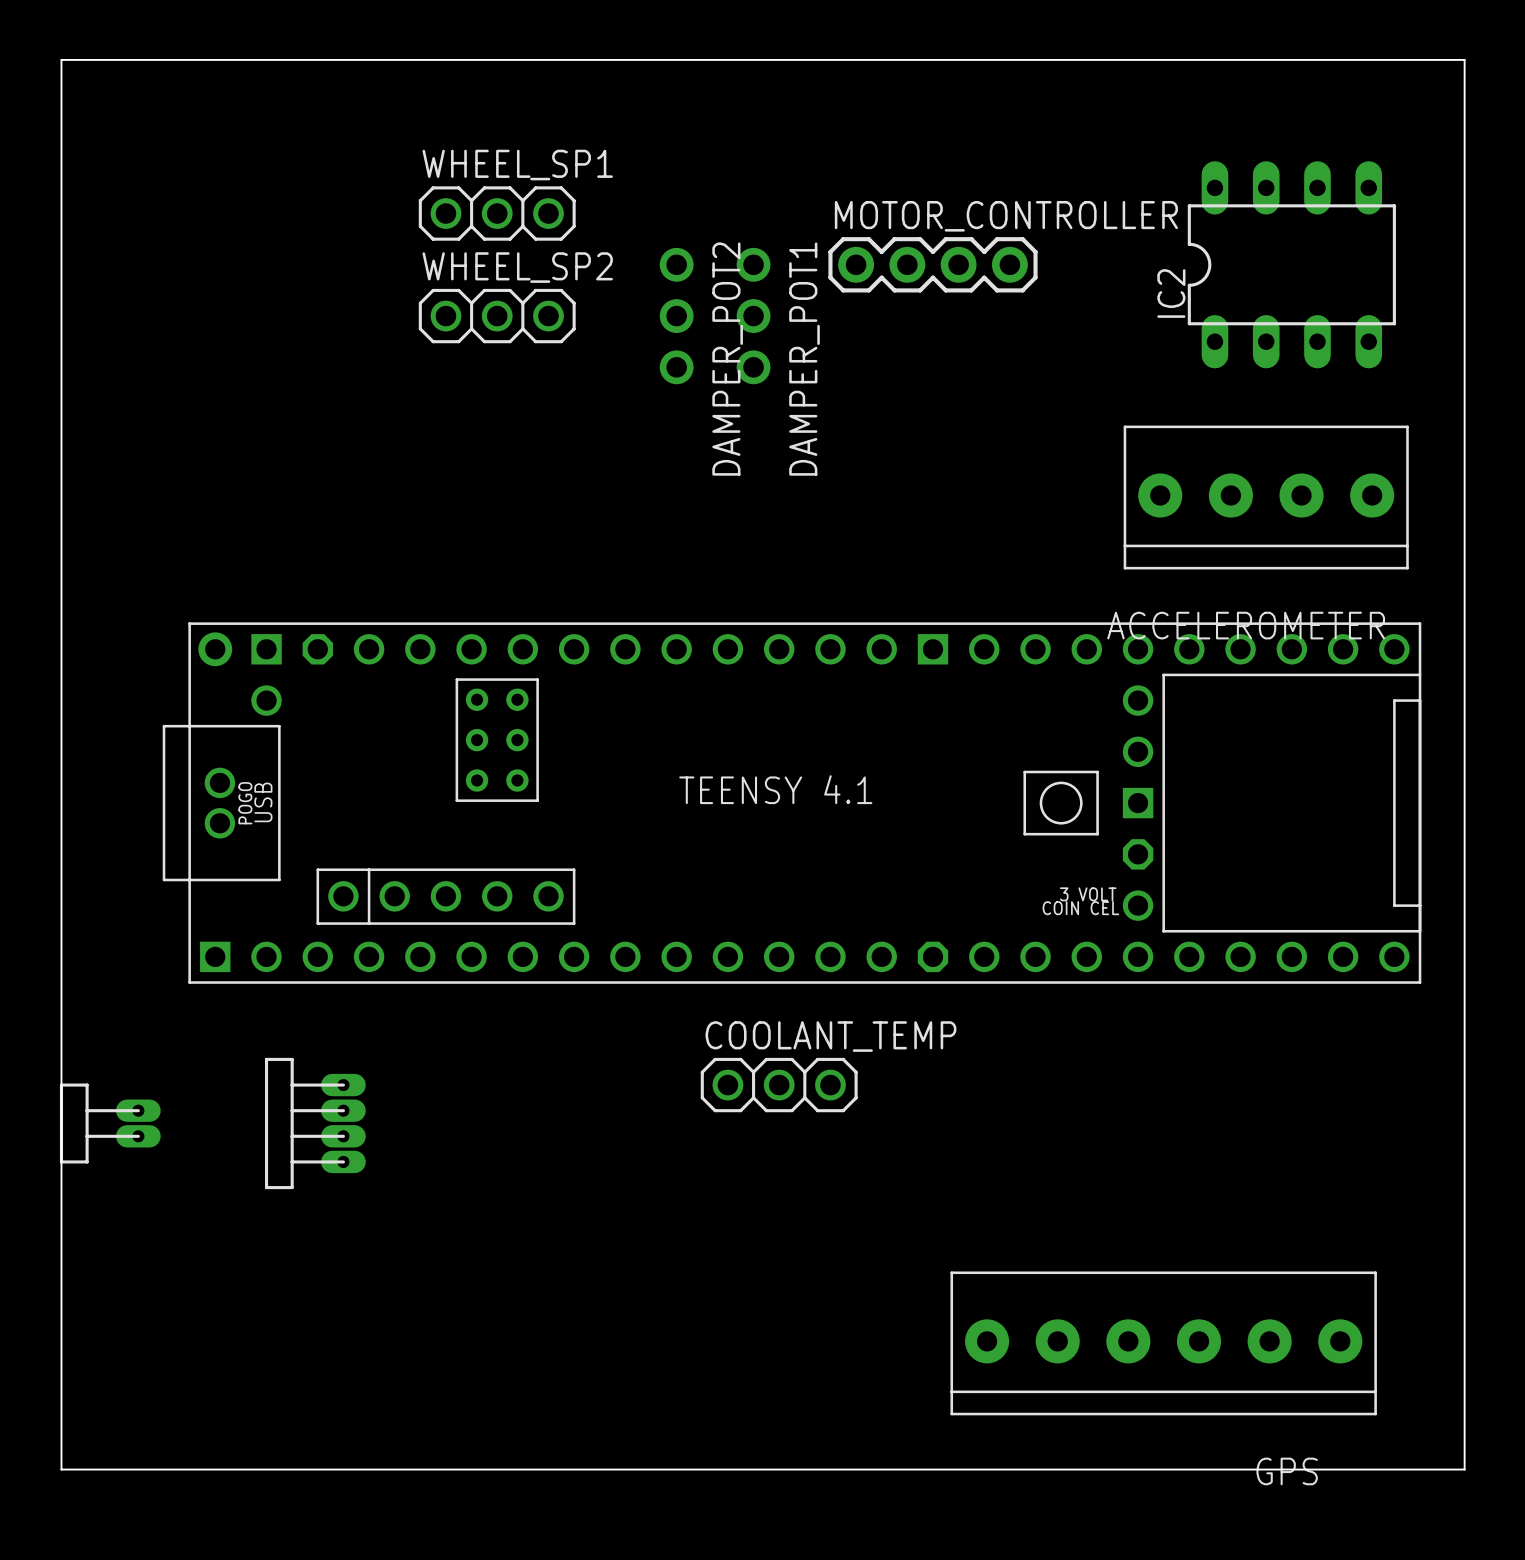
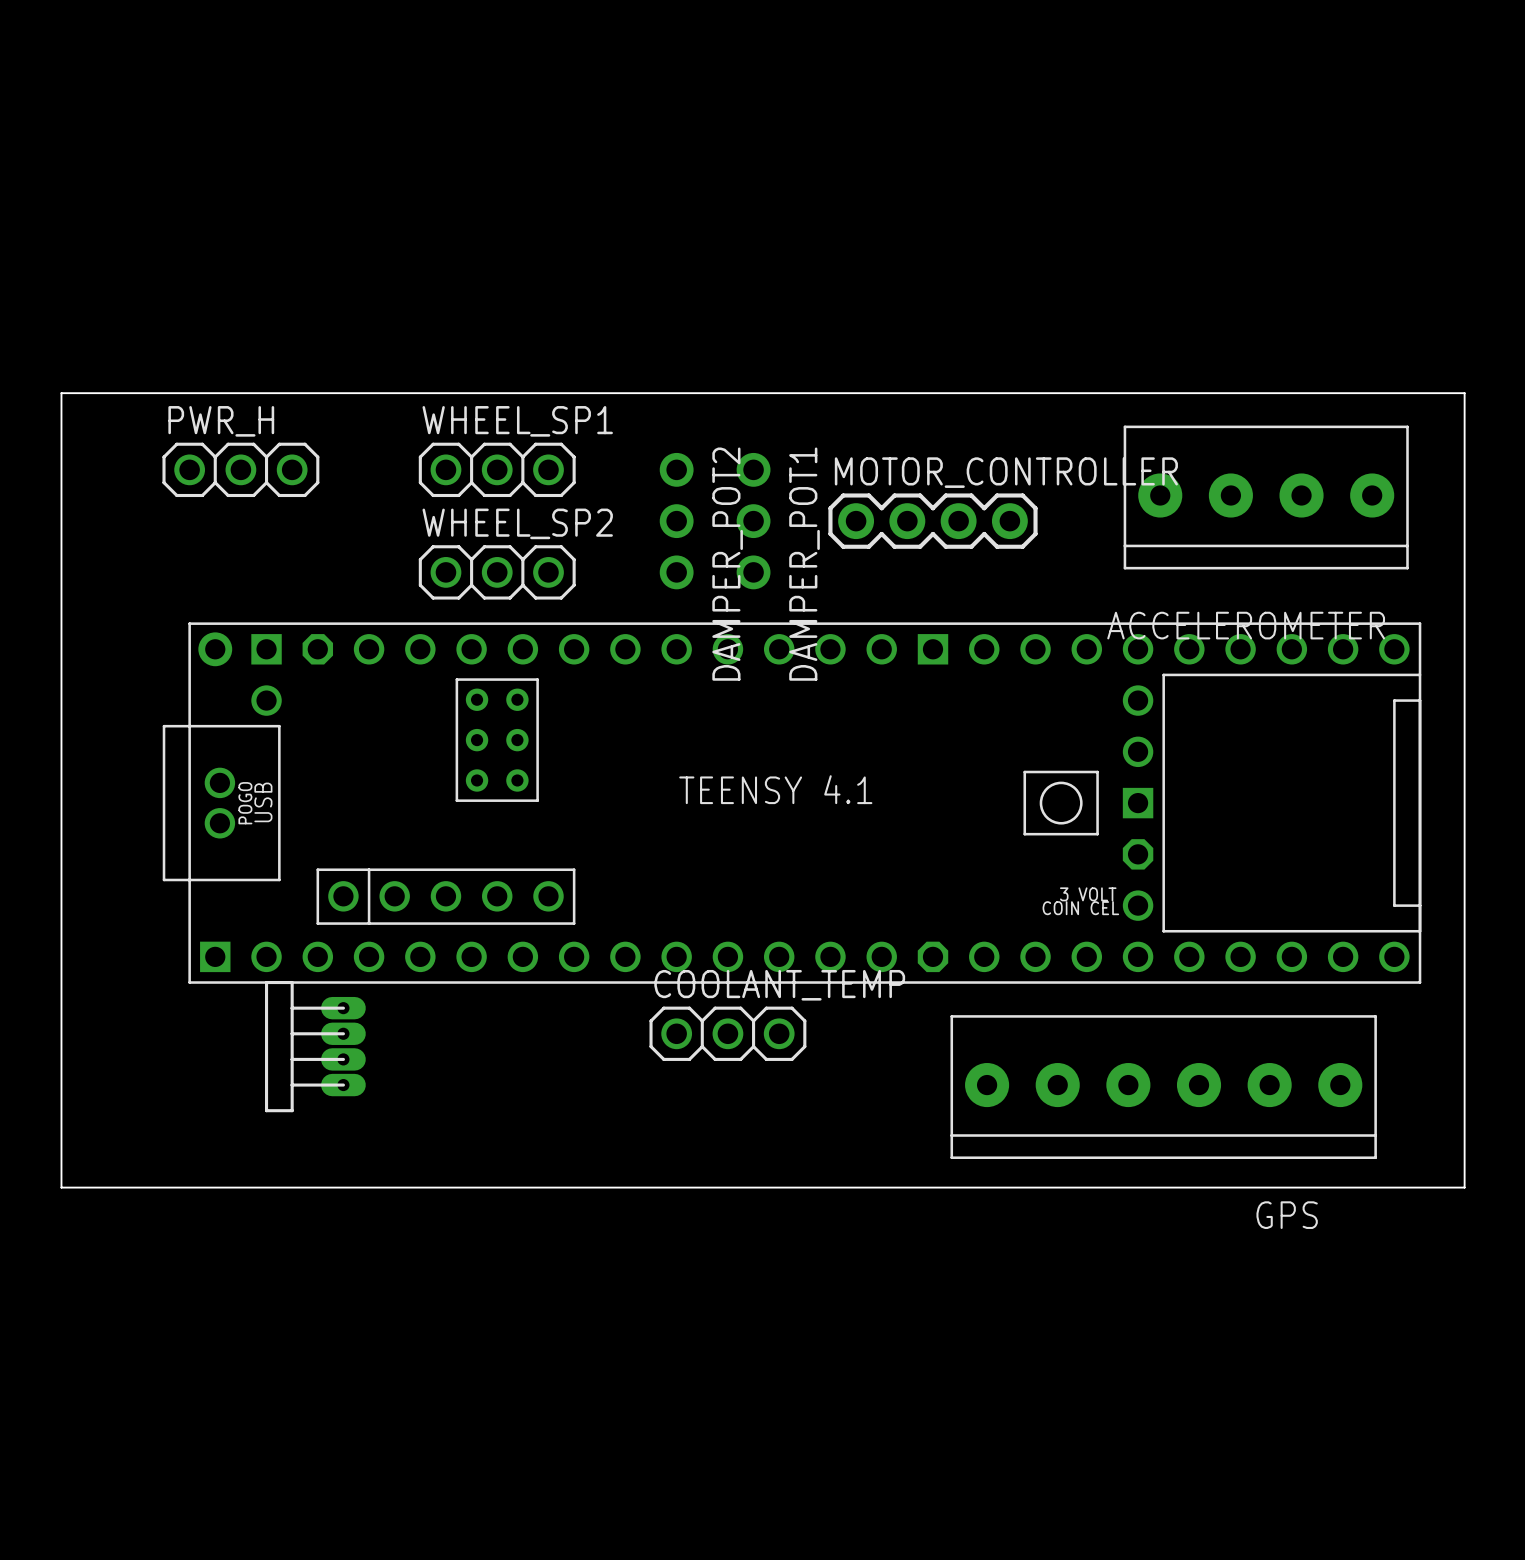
WHEEL_SP1 position: (497, 213) -> (497, 469)
MOTOR_CONTROLLER position: (932, 264) -> (932, 521)
IC2: (1291, 264) -> none
WHEEL_SP2 position: (497, 316) -> (497, 572)
DAMPER_POT2 position: (676, 316) -> (676, 521)
DAMPER_POT1 position: (753, 316) -> (753, 521)
board edge: (61, 393) (61, 59) (1464, 59) (1464, 393) -> (61, 393) (1464, 393)
PWR_H: none -> (240, 469)
COOLANT_TEMP position: (779, 1085) -> (727, 1033)
part: (110, 1123) -> none
part position: (315, 1123) -> (315, 1046)
board edge: (61, 1187) (61, 1469) (1464, 1469) (1464, 1187) -> (61, 1187) (1464, 1187)
GPS position: (1163, 1343) -> (1163, 1087)

